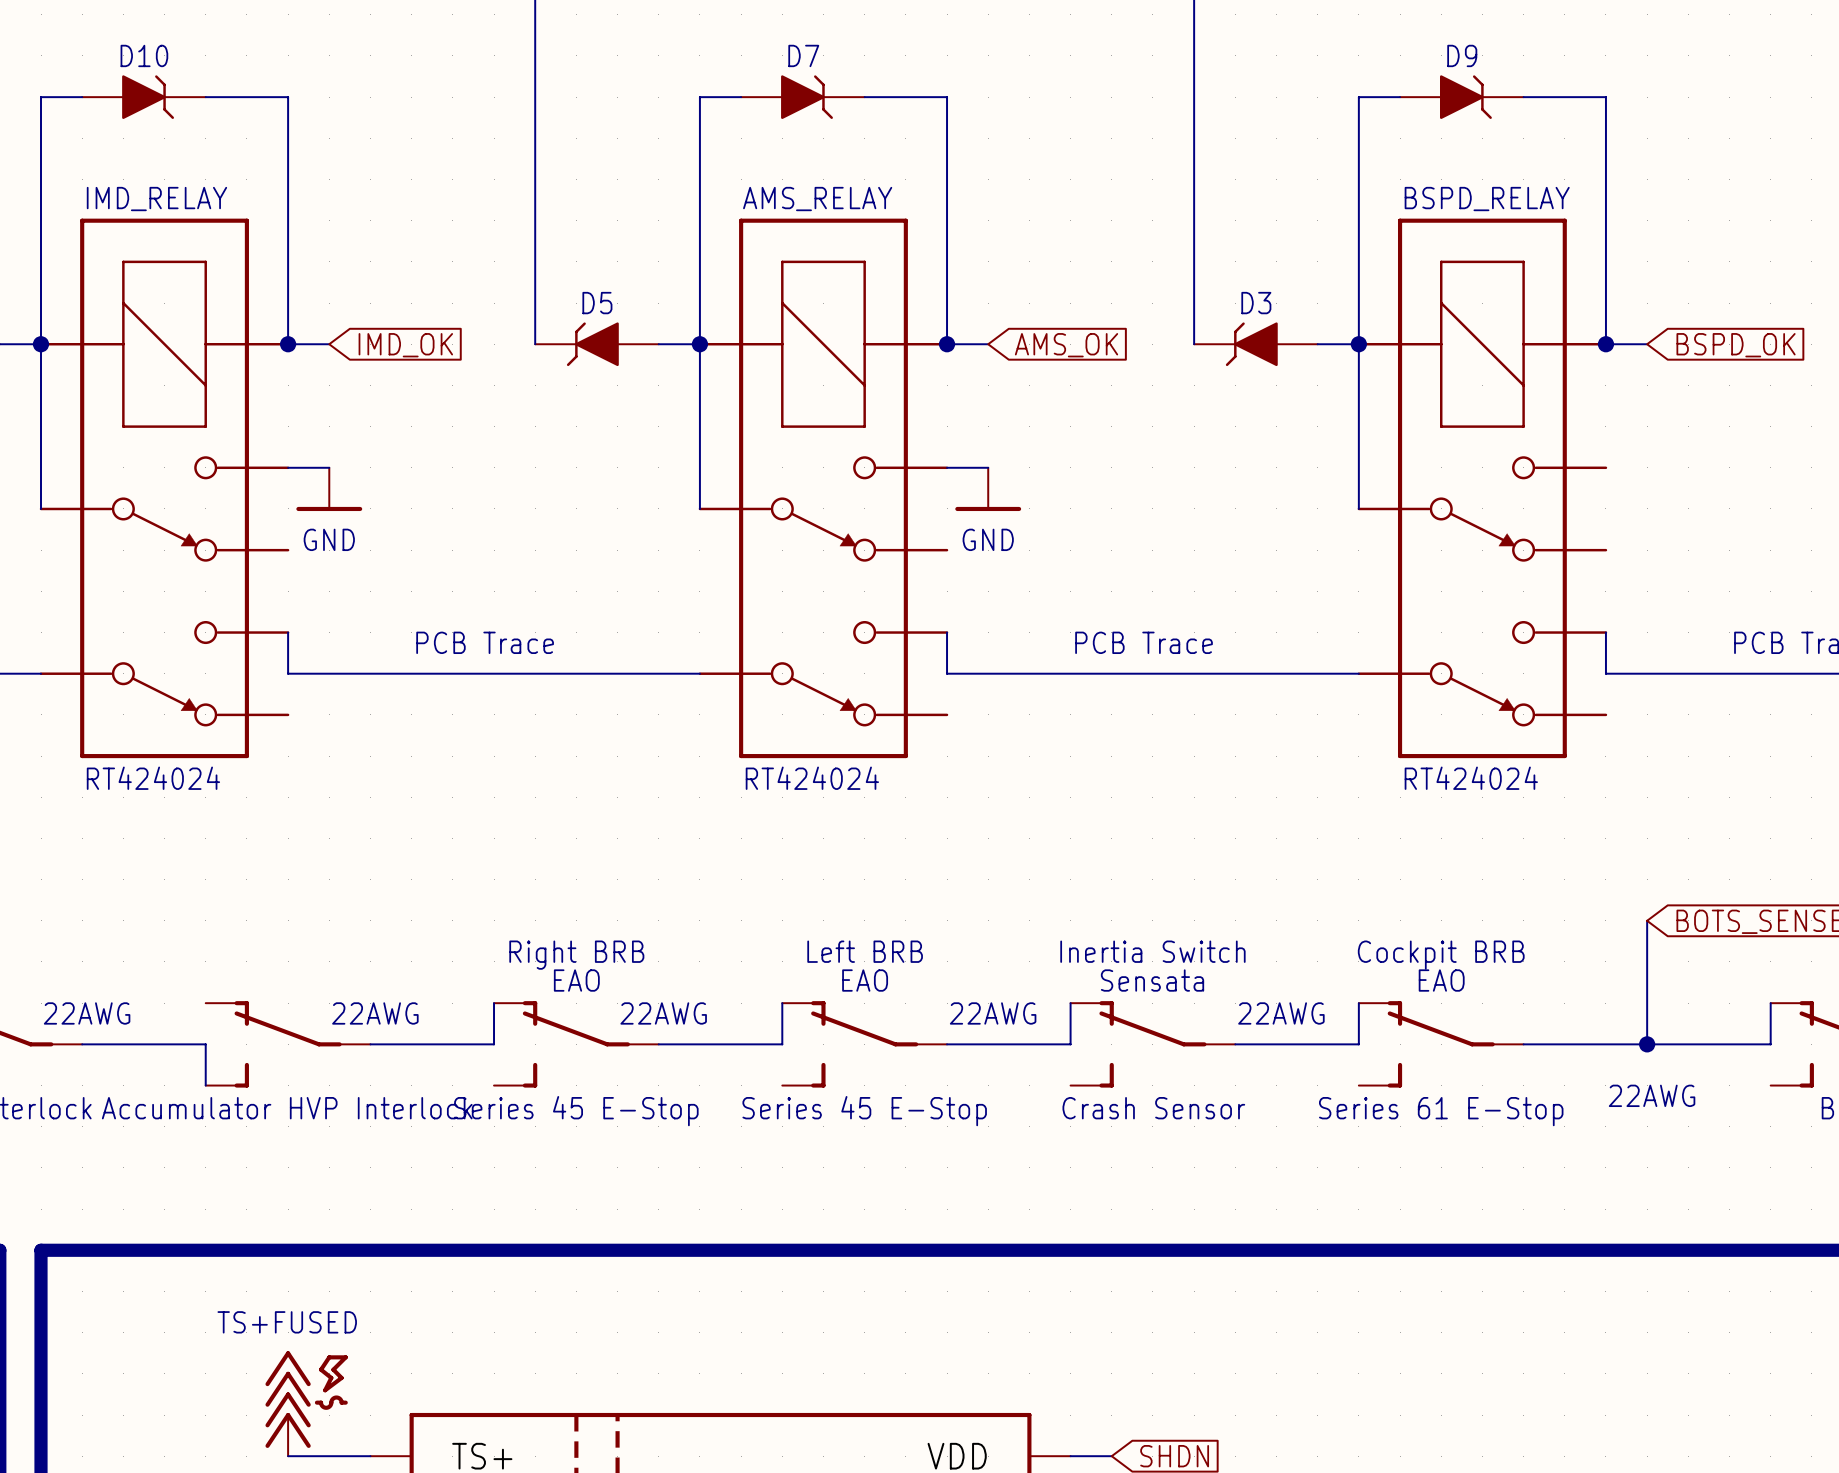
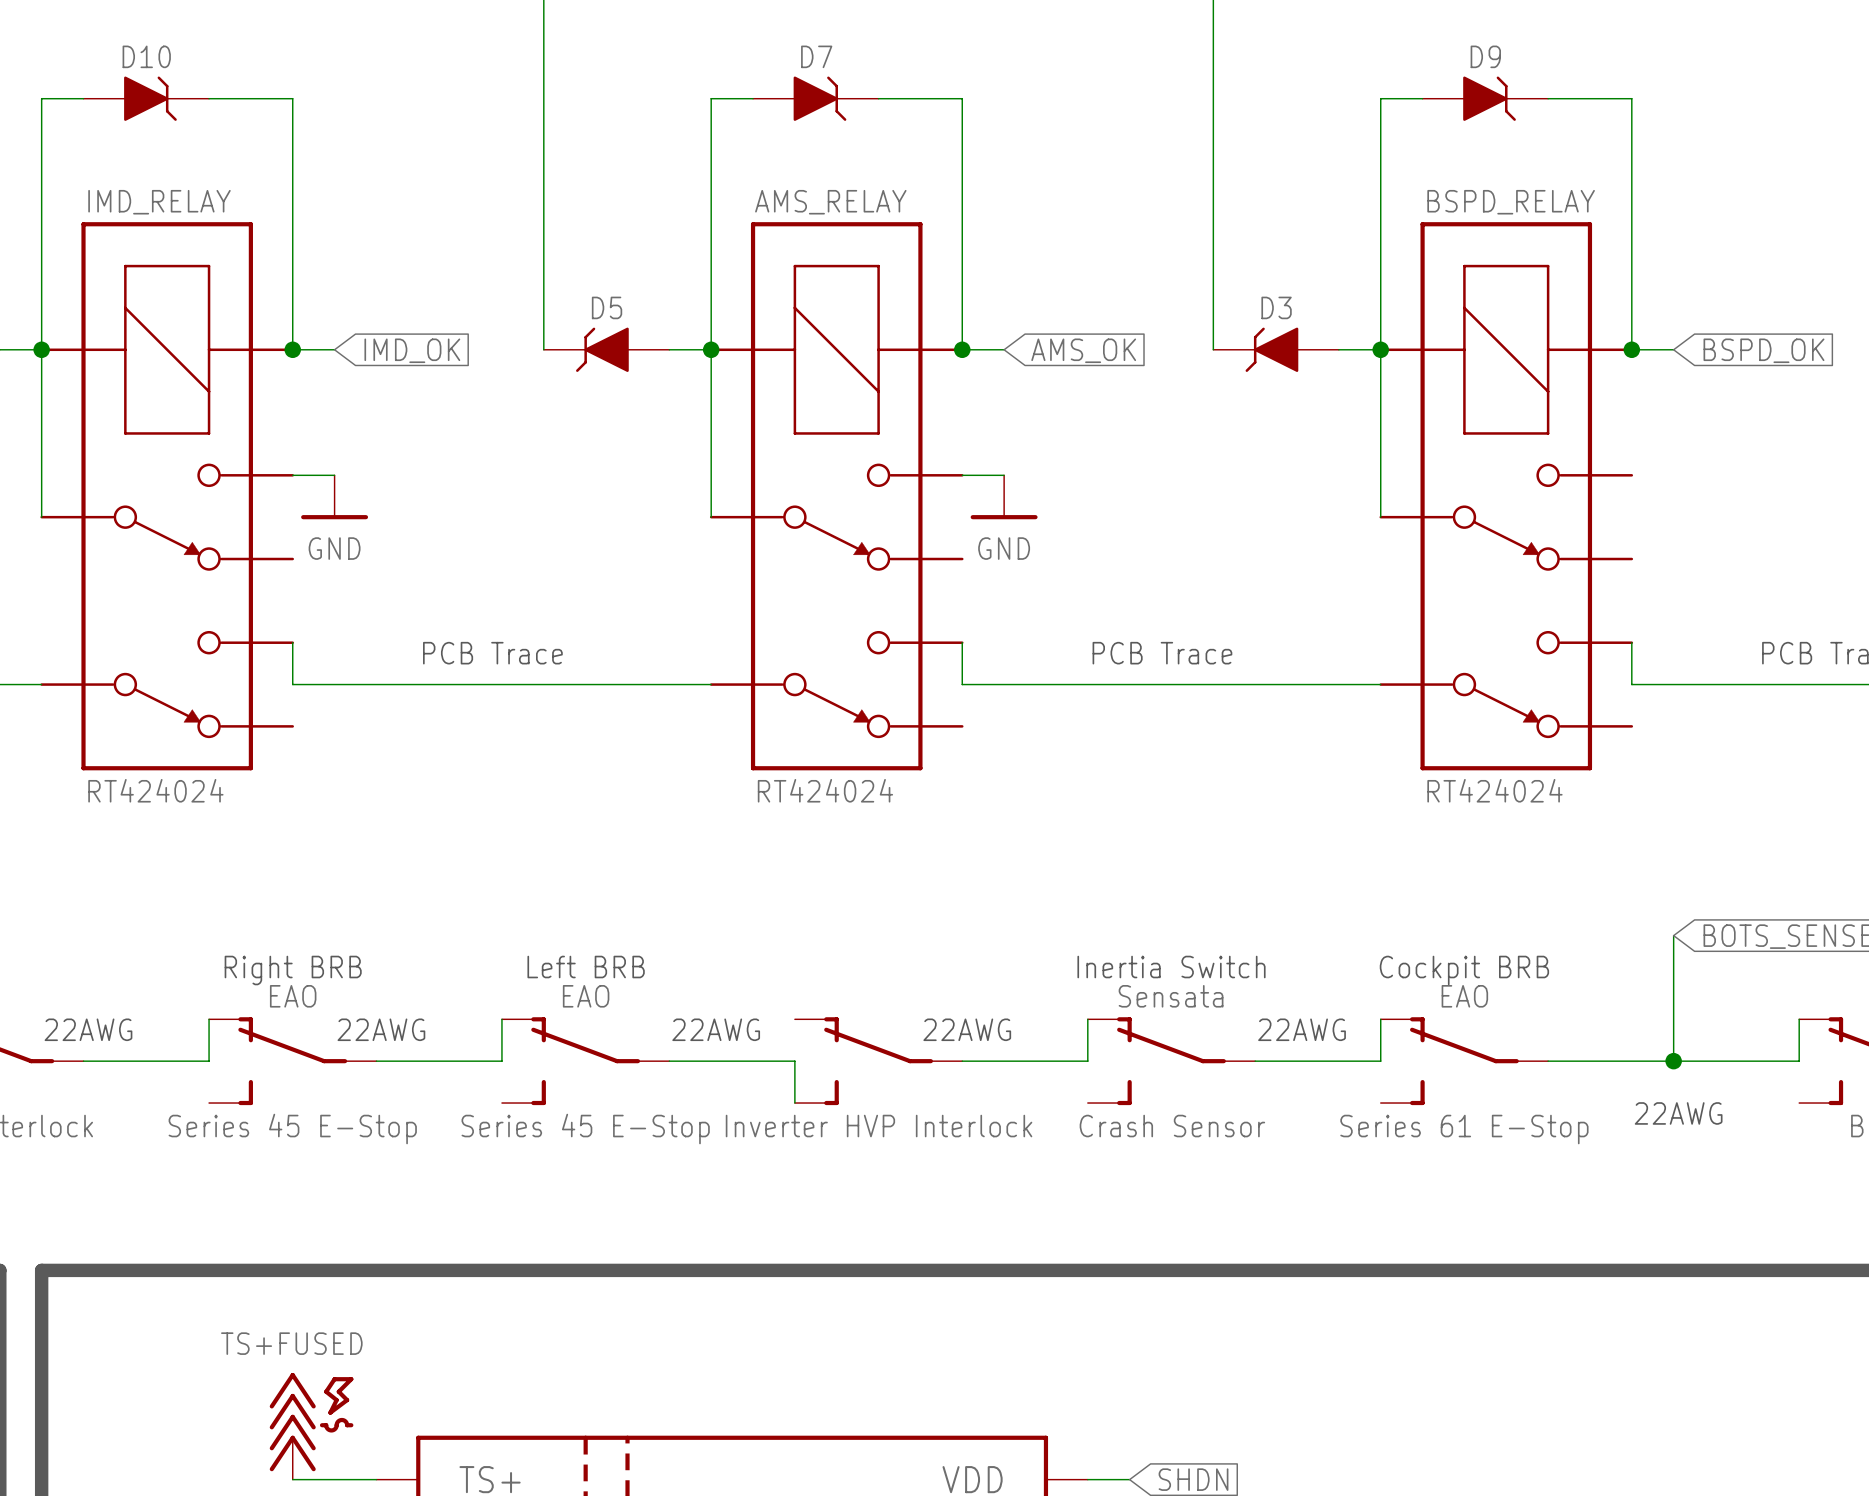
text: Left BRB (865, 951) -> none
text: none -> Right BRB (293, 970)
text: Right BRB (576, 955) -> Left BRB (586, 967)
part text: none -> EAO (293, 996)
part text: EAO (865, 980) -> none
wire: (782, 1003) (782, 1044) -> (794, 1103) (794, 1061)
text position: 22AWG (663, 1013) -> 22AWG (716, 1029)
text position: 22AWG (993, 1013) -> 22AWG (967, 1029)
wire: (205, 1044) (205, 1085) -> (209, 1061) (209, 1019)
part text: Accumulator HVP Interlock (287, 1108) -> Series 45 E-Stop (292, 1129)
part text: Series 45 E-Stop (864, 1111) -> Inverter HVP Interlock (879, 1126)

